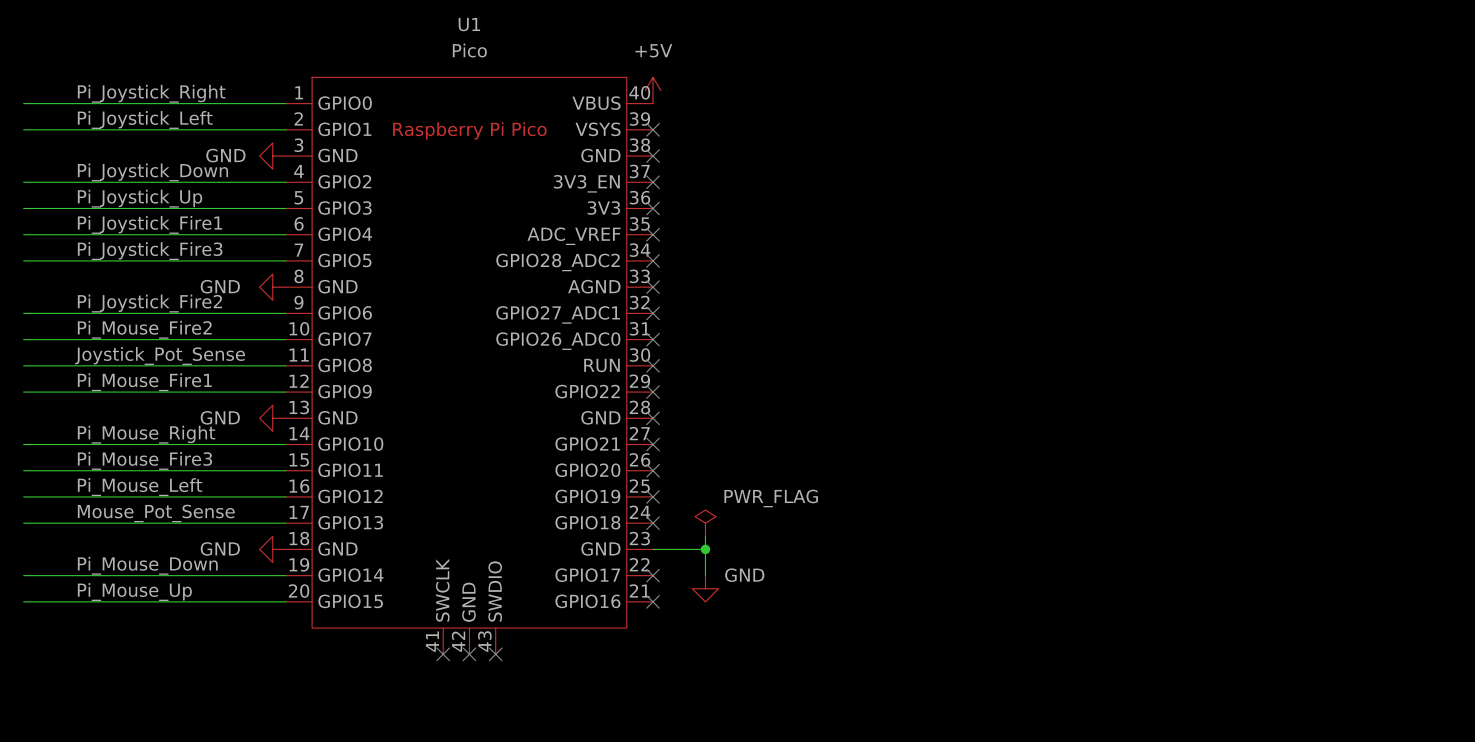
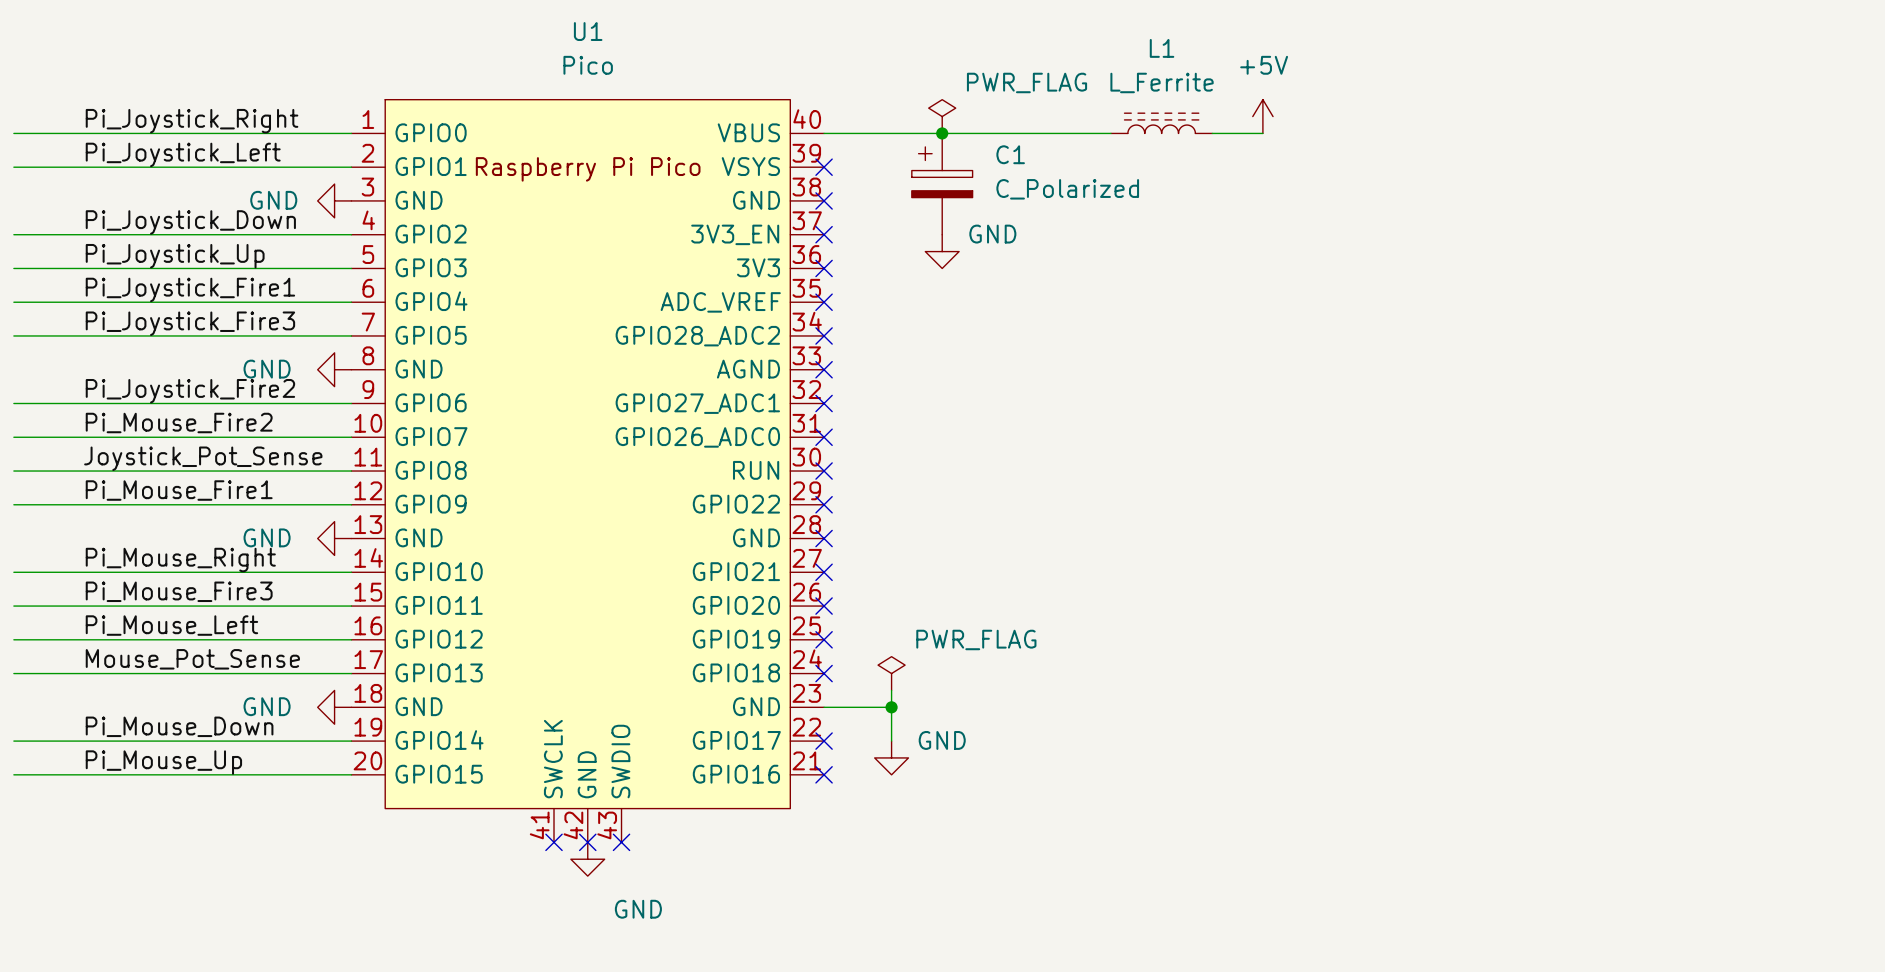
power symbol: +5V (653, 90) -> none
power symbol: none -> PWR_FLAG (942, 116)
power symbol: none -> +5V (1262, 116)
L1: none -> L_Ferrite (1161, 123)
wire: none -> (824, 133) (1111, 133)
junction: none -> (942, 133)
wire: none -> (1212, 133) (1262, 133)
C1: none -> C_Polarized (942, 184)
power symbol: none -> GND (942, 251)
power symbol: none -> GND (587, 859)

